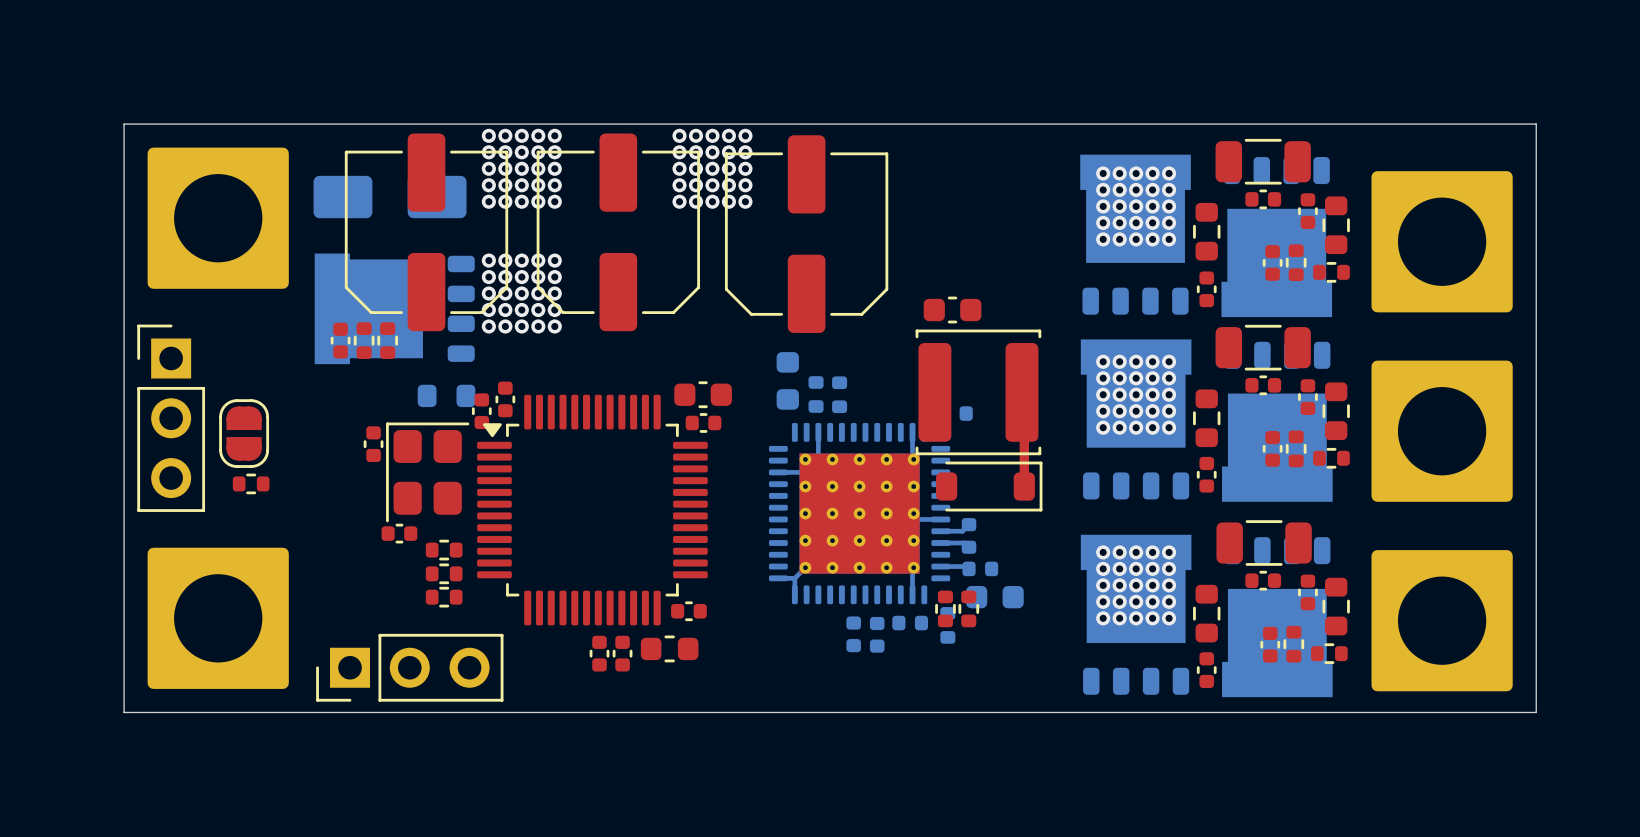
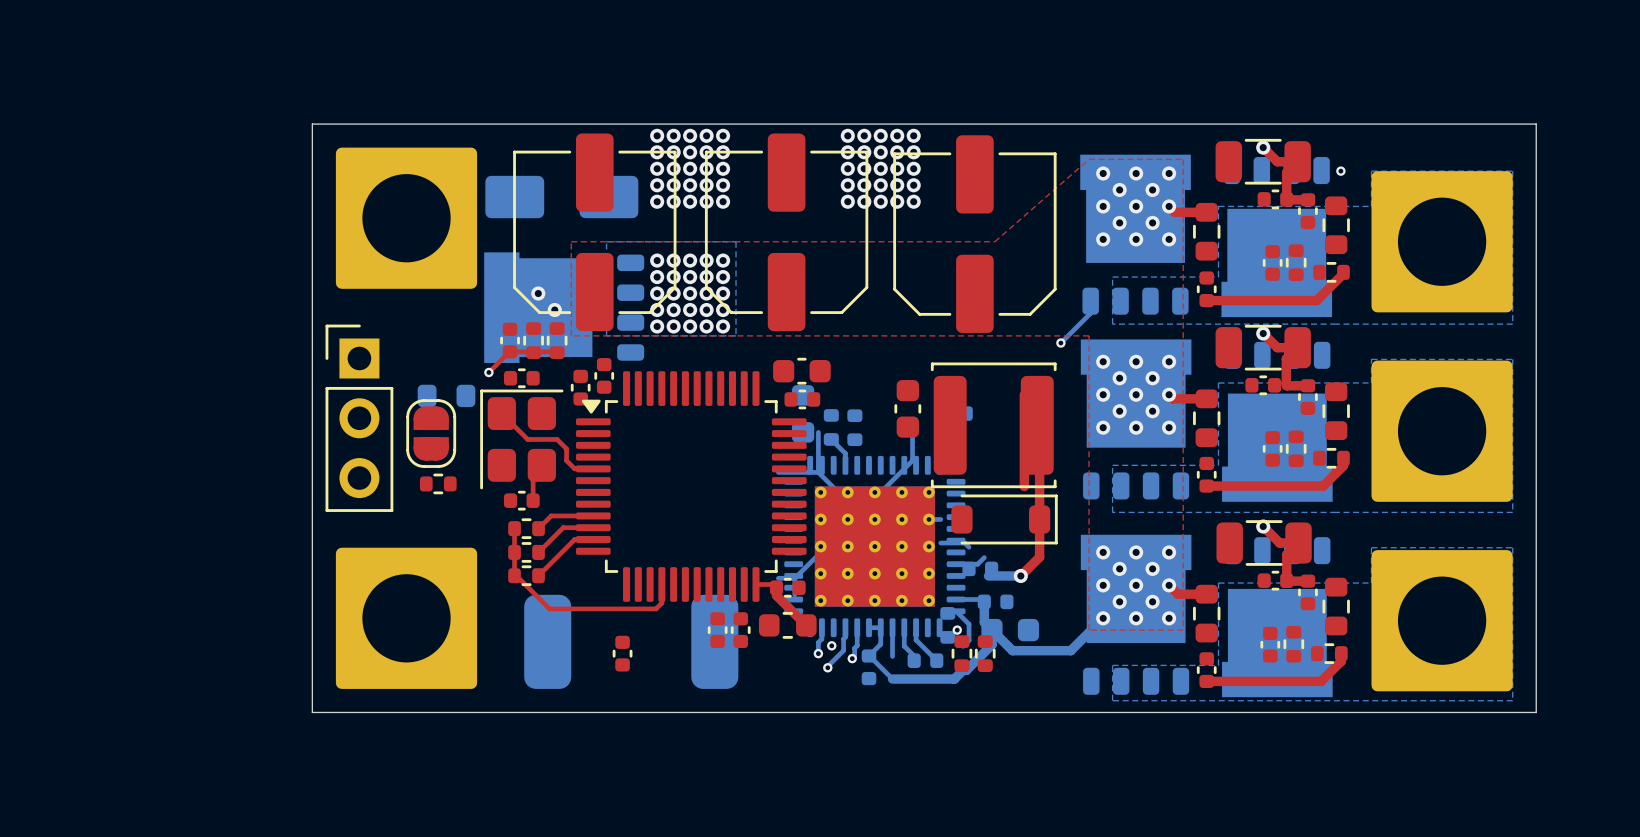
board edge: (312, 124) (124, 124) (124, 712) (312, 712) -> (312, 124) (312, 712)
via: (488, 135) -> none
via: (505, 135) -> none
via: (521, 135) -> none
via: (538, 135) -> none
via: (554, 135) -> none
via: none -> (657, 135)
via: none -> (673, 135)
via: (679, 135) -> none
via: none -> (690, 135)
via: (696, 135) -> none
via: none -> (706, 135)
via: (712, 135) -> none
via: none -> (723, 135)
via: (728, 135) -> none
via: (745, 135) -> none
via: none -> (847, 135)
via: none -> (864, 135)
via: none -> (880, 135)
via: none -> (897, 135)
via: none -> (913, 135)
top track: none -> (1263, 147) (1277, 161) (1297, 161) (1286, 172) (1286, 199) (1307, 199)
via: none -> (1263, 147)
via: (488, 152) -> none
via: (505, 152) -> none
via: (521, 152) -> none
via: (538, 152) -> none
via: (554, 152) -> none
via: none -> (657, 152)
via: none -> (673, 152)
via: (679, 152) -> none
via: none -> (690, 152)
via: (696, 152) -> none
via: none -> (706, 152)
via: (712, 152) -> none
via: none -> (723, 152)
via: (728, 152) -> none
via: (745, 152) -> none
via: none -> (847, 152)
via: none -> (864, 152)
via: none -> (880, 152)
via: none -> (897, 152)
via: none -> (913, 152)
top zone outline: none -> (1089, 159) (994, 241) (571, 241) (571, 335) (1089, 335) (1089, 630) (1183, 630) (1183, 159) (1089, 159)
via: (488, 168) -> none
via: (505, 168) -> none
via: (521, 168) -> none
via: (538, 168) -> none
via: (554, 168) -> none
via: none -> (657, 168)
via: none -> (673, 168)
via: (679, 168) -> none
via: none -> (690, 168)
via: (696, 168) -> none
via: none -> (706, 168)
via: (712, 168) -> none
via: none -> (723, 168)
via: (728, 168) -> none
via: (745, 168) -> none
via: none -> (847, 168)
via: none -> (864, 168)
via: none -> (880, 168)
via: none -> (897, 168)
via: none -> (913, 168)
via: none -> (1340, 171)
bottom zone outline: none -> (1371, 171) (1371, 206) (1218, 206) (1218, 277) (1112, 277) (1112, 324) (1512, 324) (1512, 171) (1371, 171)
via: (1119, 173) -> none
via: (1152, 173) -> none
via: (488, 185) -> none
via: (505, 185) -> none
via: (521, 185) -> none
via: (538, 185) -> none
via: (554, 185) -> none
via: none -> (657, 185)
via: none -> (673, 185)
via: (679, 185) -> none
via: none -> (690, 185)
via: (696, 185) -> none
via: none -> (706, 185)
via: (712, 185) -> none
via: none -> (723, 185)
via: (728, 185) -> none
via: (745, 185) -> none
via: none -> (847, 185)
via: none -> (864, 185)
via: none -> (880, 185)
via: none -> (897, 185)
via: none -> (913, 185)
via: (1103, 189) -> none
via: (1136, 189) -> none
via: (1169, 189) -> none
part position: (390, 197) -> (561, 197)
part position: (1263, 199) -> (1275, 199)
via: (488, 201) -> none
via: (505, 201) -> none
via: (521, 201) -> none
via: (538, 201) -> none
via: (554, 201) -> none
via: none -> (657, 201)
via: none -> (673, 201)
via: (679, 201) -> none
via: none -> (690, 201)
via: (696, 201) -> none
via: none -> (706, 201)
via: (712, 201) -> none
via: none -> (723, 201)
via: (728, 201) -> none
via: (745, 201) -> none
via: none -> (847, 201)
via: none -> (864, 201)
via: none -> (880, 201)
via: none -> (897, 201)
via: none -> (913, 201)
via: (1119, 206) -> none
via: (1152, 206) -> none
top track: none -> (1169, 206) (1174, 212) (1206, 212)
part position: (218, 218) -> (406, 218)
via: (1103, 222) -> none
via: (1136, 222) -> none
via: (1169, 222) -> none
part position: (426, 232) -> (974, 234)
part position: (618, 232) -> (594, 232)
part position: (806, 234) -> (786, 232)
via: (1119, 239) -> none
via: (1152, 239) -> none
bottom zone outline: none -> (606, 241) (736, 241) (736, 335) (606, 335) (606, 241)
via: (488, 260) -> none
via: (505, 260) -> none
via: (521, 260) -> none
via: (538, 260) -> none
via: (554, 260) -> none
via: none -> (657, 260)
via: none -> (673, 260)
via: none -> (690, 260)
via: none -> (706, 260)
via: none -> (723, 260)
top track: none -> (1343, 272) (1316, 300) (1206, 300)
via: (488, 277) -> none
via: (505, 277) -> none
via: (521, 277) -> none
via: (538, 277) -> none
via: (554, 277) -> none
via: none -> (657, 277)
via: none -> (673, 277)
via: none -> (690, 277)
via: none -> (706, 277)
via: none -> (723, 277)
via: (488, 293) -> none
via: (505, 293) -> none
via: (521, 293) -> none
via: (554, 293) -> none
via: none -> (657, 293)
via: none -> (673, 293)
via: none -> (690, 293)
via: none -> (706, 293)
via: none -> (723, 293)
bottom track: none -> (1090, 301) (1090, 313) (1060, 343)
part position: (394, 308) -> (564, 307)
via: (488, 310) -> none
via: (505, 310) -> none
via: (521, 310) -> none
via: (538, 310) -> none
via: none -> (657, 310)
via: none -> (673, 310)
via: none -> (690, 310)
via: none -> (706, 310)
via: none -> (723, 310)
part: (952, 310) -> none
via: (488, 326) -> none
via: (505, 326) -> none
via: (521, 326) -> none
via: (538, 326) -> none
via: (554, 326) -> none
via: none -> (657, 326)
via: none -> (673, 326)
via: none -> (690, 326)
via: none -> (706, 326)
via: none -> (723, 326)
top track: none -> (1263, 333) (1277, 347) (1297, 347) (1286, 359) (1286, 385) (1307, 385)
via: none -> (1263, 333)
part: (340, 340) -> none
part: (364, 340) -> none
part: (387, 340) -> none
part: none -> (510, 340)
part: none -> (533, 340)
part: none -> (557, 340)
via: none -> (1060, 343)
top track: none -> (557, 352) (509, 351) (488, 372)
bottom zone outline: none -> (1371, 359) (1371, 382) (1218, 382) (1218, 465) (1112, 465) (1112, 512) (1512, 512) (1512, 359) (1371, 359)
via: (1119, 361) -> none
via: (1152, 361) -> none
part: none -> (801, 371)
via: none -> (488, 372)
part: none -> (604, 375)
part: none -> (521, 378)
via: (1103, 378) -> none
via: (1136, 378) -> none
via: (1169, 378) -> none
part position: (787, 380) -> (803, 413)
part: none -> (580, 387)
part position: (978, 392) -> (993, 425)
part: (703, 394) -> none
part: (816, 394) -> none
part: (839, 394) -> none
via: (1119, 394) -> none
via: (1152, 394) -> none
top track: none -> (1169, 394) (1173, 398) (1206, 398)
part: (505, 399) -> none
part: none -> (802, 399)
part: none -> (907, 408)
part: (481, 411) -> none
via: (1103, 411) -> none
via: (1136, 411) -> none
via: (1169, 411) -> none
top track: none -> (506, 413) (506, 418) (527, 439) (557, 439) (566, 448) (566, 460) (574, 468) (593, 468)
part: (171, 418) -> none
part: none -> (359, 418)
part footprint: [386, 422, 470, 523] -> [419, 473, 457, 495]
part: (703, 422) -> none
part: none -> (831, 427)
part: none -> (854, 427)
top track: none -> (1039, 427) (1039, 557) (1020, 575)
via: (1119, 427) -> none
via: (1152, 427) -> none
part position: (244, 433) -> (431, 433)
part: none -> (521, 439)
bottom track: none -> (831, 439) (845, 453) (845, 465)
part: (373, 444) -> none
top track: none -> (1343, 458) (1343, 465) (1323, 486) (1206, 486)
top track: none -> (533, 474) (533, 500)
part: (251, 483) -> none
part position: (989, 486) -> (1004, 519)
part: none -> (521, 500)
part position: (592, 510) -> (691, 486)
part position: (859, 513) -> (874, 546)
top track: none -> (593, 515) (551, 515) (538, 528)
bottom track: (969, 524) (962, 531) (940, 531) -> (984, 557) (977, 564) (956, 564)
top track: none -> (1263, 526) (1279, 543) (1298, 543) (1286, 554) (1286, 580) (1307, 581)
via: none -> (1263, 526)
top track: none -> (593, 527) (563, 527) (538, 552)
top track: none -> (514, 528) (514, 573) (549, 608) (655, 608) (661, 603) (661, 584)
part: none -> (526, 528)
part: (399, 533) -> none
part: (969, 535) -> none
top track: none -> (593, 539) (574, 539) (538, 575)
bottom zone outline: none -> (1371, 547) (1371, 583) (1218, 583) (1218, 665) (1112, 665) (1112, 700) (1512, 700) (1512, 547) (1371, 547)
part: (444, 550) -> none
part: none -> (526, 552)
via: (1119, 552) -> none
via: (1152, 552) -> none
bottom track: (940, 566) (966, 566) (969, 568) -> none
via: (1103, 568) -> none
via: (1136, 568) -> none
via: (1169, 568) -> none
part: (444, 573) -> none
part: none -> (526, 575)
bottom track: none -> (988, 575) (1020, 575)
via: none -> (1020, 575)
part position: (1263, 580) -> (1275, 580)
top track: none -> (756, 584) (773, 584) (776, 587) (776, 595) (806, 625)
part footprint: [966, 585, 1024, 609] -> [977, 594, 1014, 610]
via: (1119, 585) -> none
bottom track: none -> (1136, 585) (1070, 650) (1012, 650) (984, 622) (984, 601) (981, 599) (956, 599)
via: (1152, 585) -> none
top track: none -> (1169, 585) (1177, 594) (1206, 594)
part: none -> (787, 587)
part: (444, 597) -> none
via: (1103, 601) -> none
via: (1136, 601) -> none
via: (1169, 601) -> none
part: (945, 608) -> none
part: (968, 608) -> none
part: (688, 611) -> none
bottom track: none -> (956, 611) (969, 624) (969, 640) (963, 646)
part position: (218, 618) -> (406, 618)
via: (1119, 618) -> none
via: (1152, 618) -> none
part: (910, 623) -> none
bottom track: none -> (821, 627) (821, 638) (818, 642) (818, 653)
bottom track: none -> (845, 627) (843, 650) (827, 667)
bottom track: none -> (857, 627) (857, 645) (854, 648) (854, 656) (852, 658)
bottom track: none -> (868, 627) (880, 627) (880, 644) (868, 655)
bottom track: none -> (892, 627) (892, 656)
bottom track: none -> (904, 627) (904, 646) (914, 656) (914, 660)
bottom track: none -> (916, 627) (916, 639) (936, 660)
part: none -> (717, 630)
part: none -> (740, 630)
via: none -> (957, 630)
bottom track: none -> (991, 630) (991, 644) (966, 670) (963, 670) (954, 679) (892, 679) (869, 655)
part: none -> (1010, 630)
part: (853, 634) -> none
part: (877, 634) -> none
part: none -> (547, 641)
part: none -> (714, 641)
via: none -> (831, 645)
part position: (669, 648) -> (787, 625)
part: (599, 653) -> none
via: none -> (818, 653)
part: none -> (961, 653)
part: none -> (985, 653)
top track: none -> (1341, 653) (1341, 661) (1321, 681) (1206, 681)
via: none -> (852, 658)
part: none -> (925, 660)
part: (409, 667) -> none
via: none -> (827, 667)
part: none -> (868, 667)

